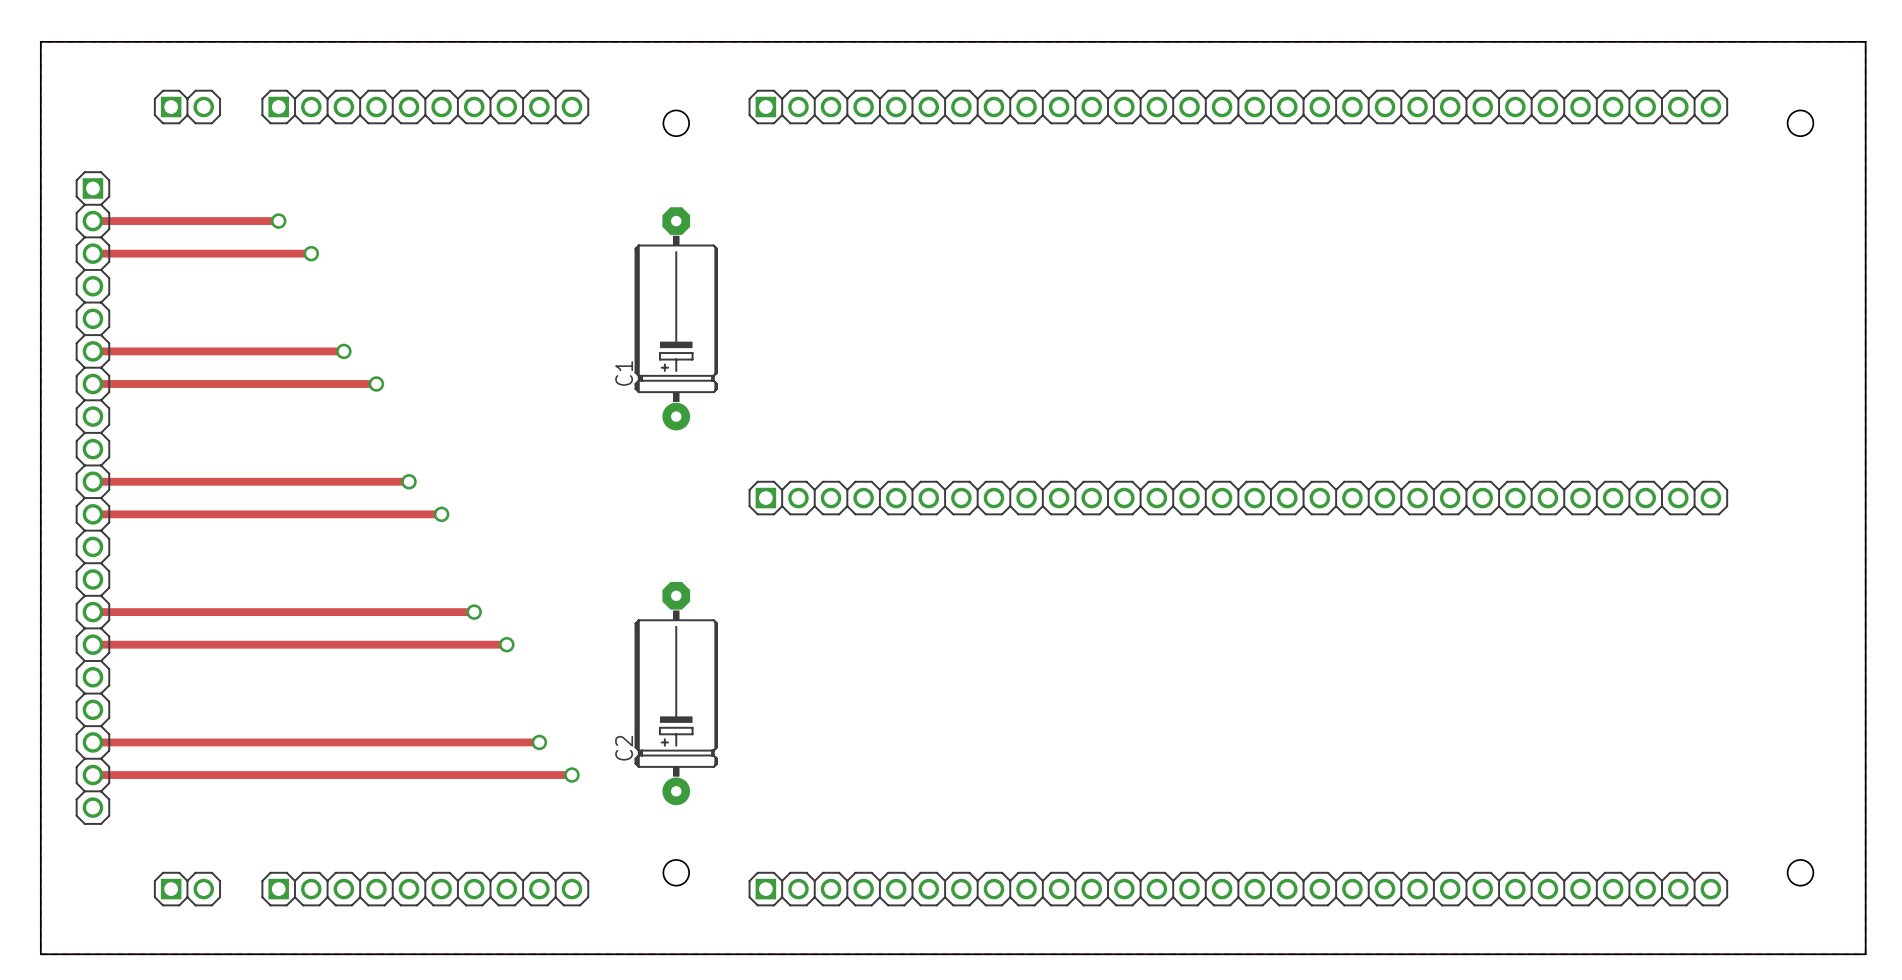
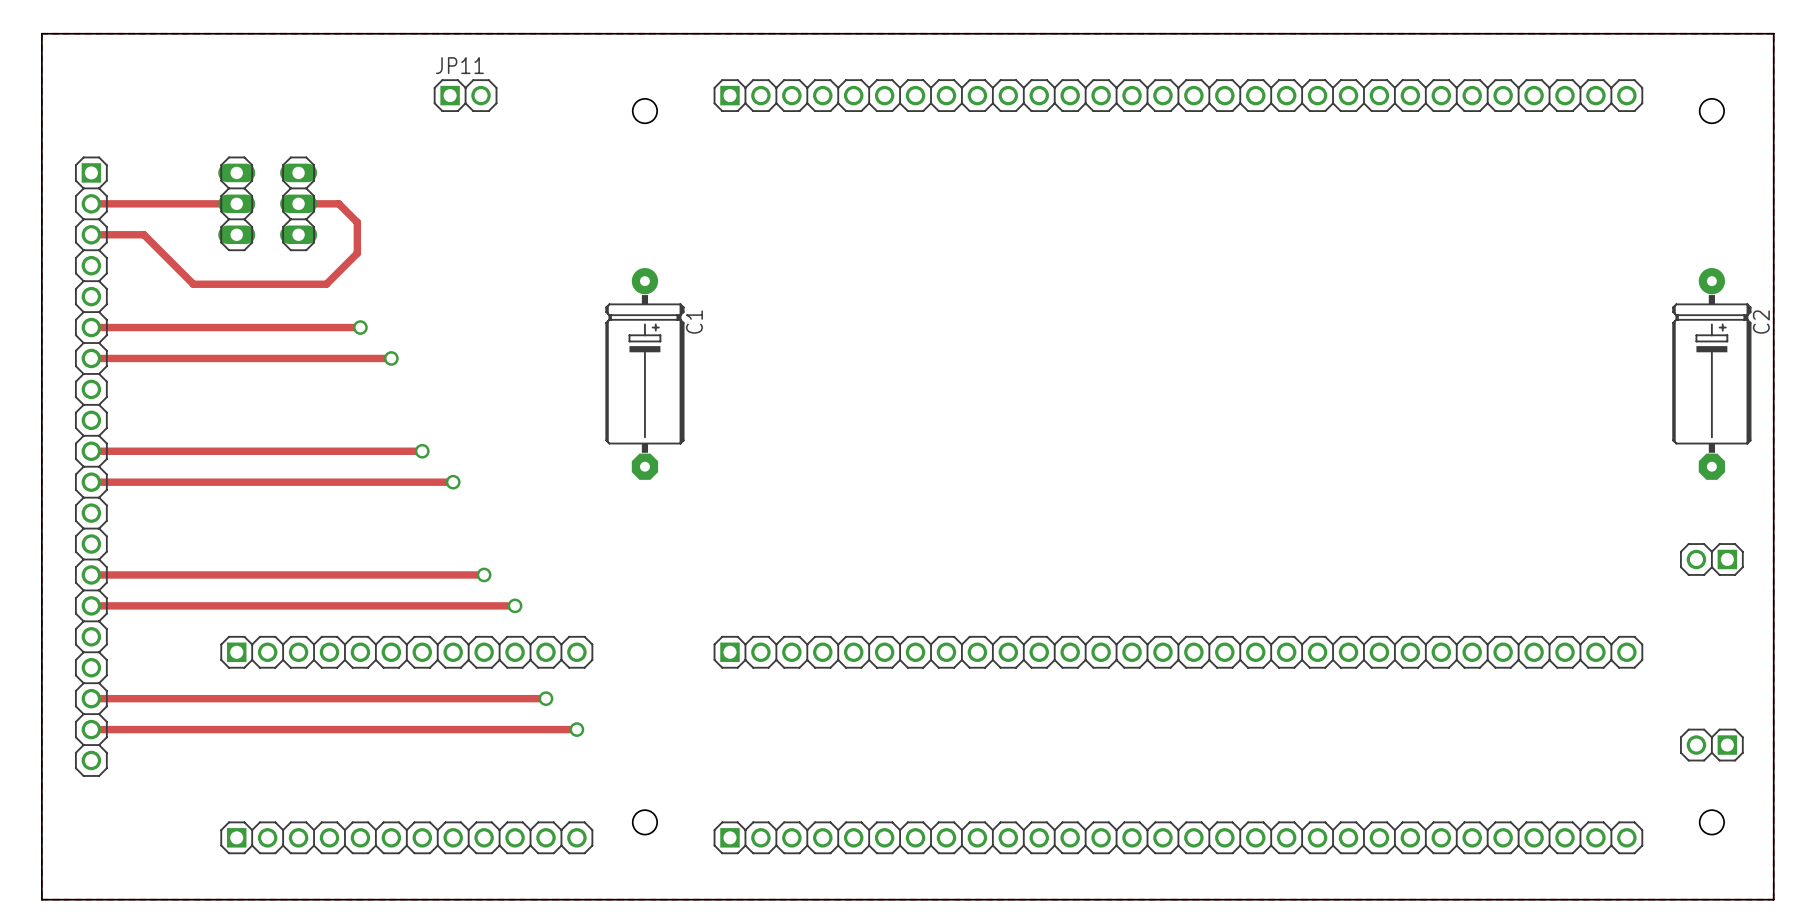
part: (187, 107) -> none
part: (425, 107) -> none
JP11: none -> (465, 95)
track: (246, 221) (278, 221) -> (329, 327) (360, 327)
part: none -> (236, 203)
via: (278, 221) -> none
part: none -> (298, 203)
track: (148, 253) (311, 253) -> (143, 234) (193, 284) (326, 284) (357, 253) (357, 222) (338, 203) (298, 203)
via: (311, 253) -> none
C1 rotation: 0° (676, 318) -> 180° (644, 373)
via: (343, 351) -> none
via: none -> (360, 327)
track: none -> (360, 358) (391, 358)
via: (376, 383) -> none
via: none -> (391, 358)
track: none -> (391, 451) (422, 451)
via: (409, 481) -> none
via: none -> (422, 451)
part position: (1238, 498) -> (1178, 652)
track: none -> (422, 482) (453, 482)
via: (441, 514) -> none
via: none -> (453, 482)
part: none -> (1711, 559)
track: none -> (453, 574) (484, 574)
via: (474, 612) -> none
via: none -> (484, 574)
track: none -> (484, 605) (515, 605)
via: (506, 644) -> none
via: none -> (515, 605)
part: none -> (406, 652)
C2 rotation: 0° (676, 693) -> 180° (1711, 373)
C2 position: (676, 693) -> (1711, 373)
track: none -> (515, 698) (545, 698)
via: (539, 742) -> none
via: none -> (545, 698)
track: none -> (545, 729) (576, 729)
via: (571, 775) -> none
via: none -> (576, 729)
part: none -> (1711, 745)
part footprint: [261, 871, 590, 907] -> [220, 821, 594, 855]
part: (187, 889) -> none

